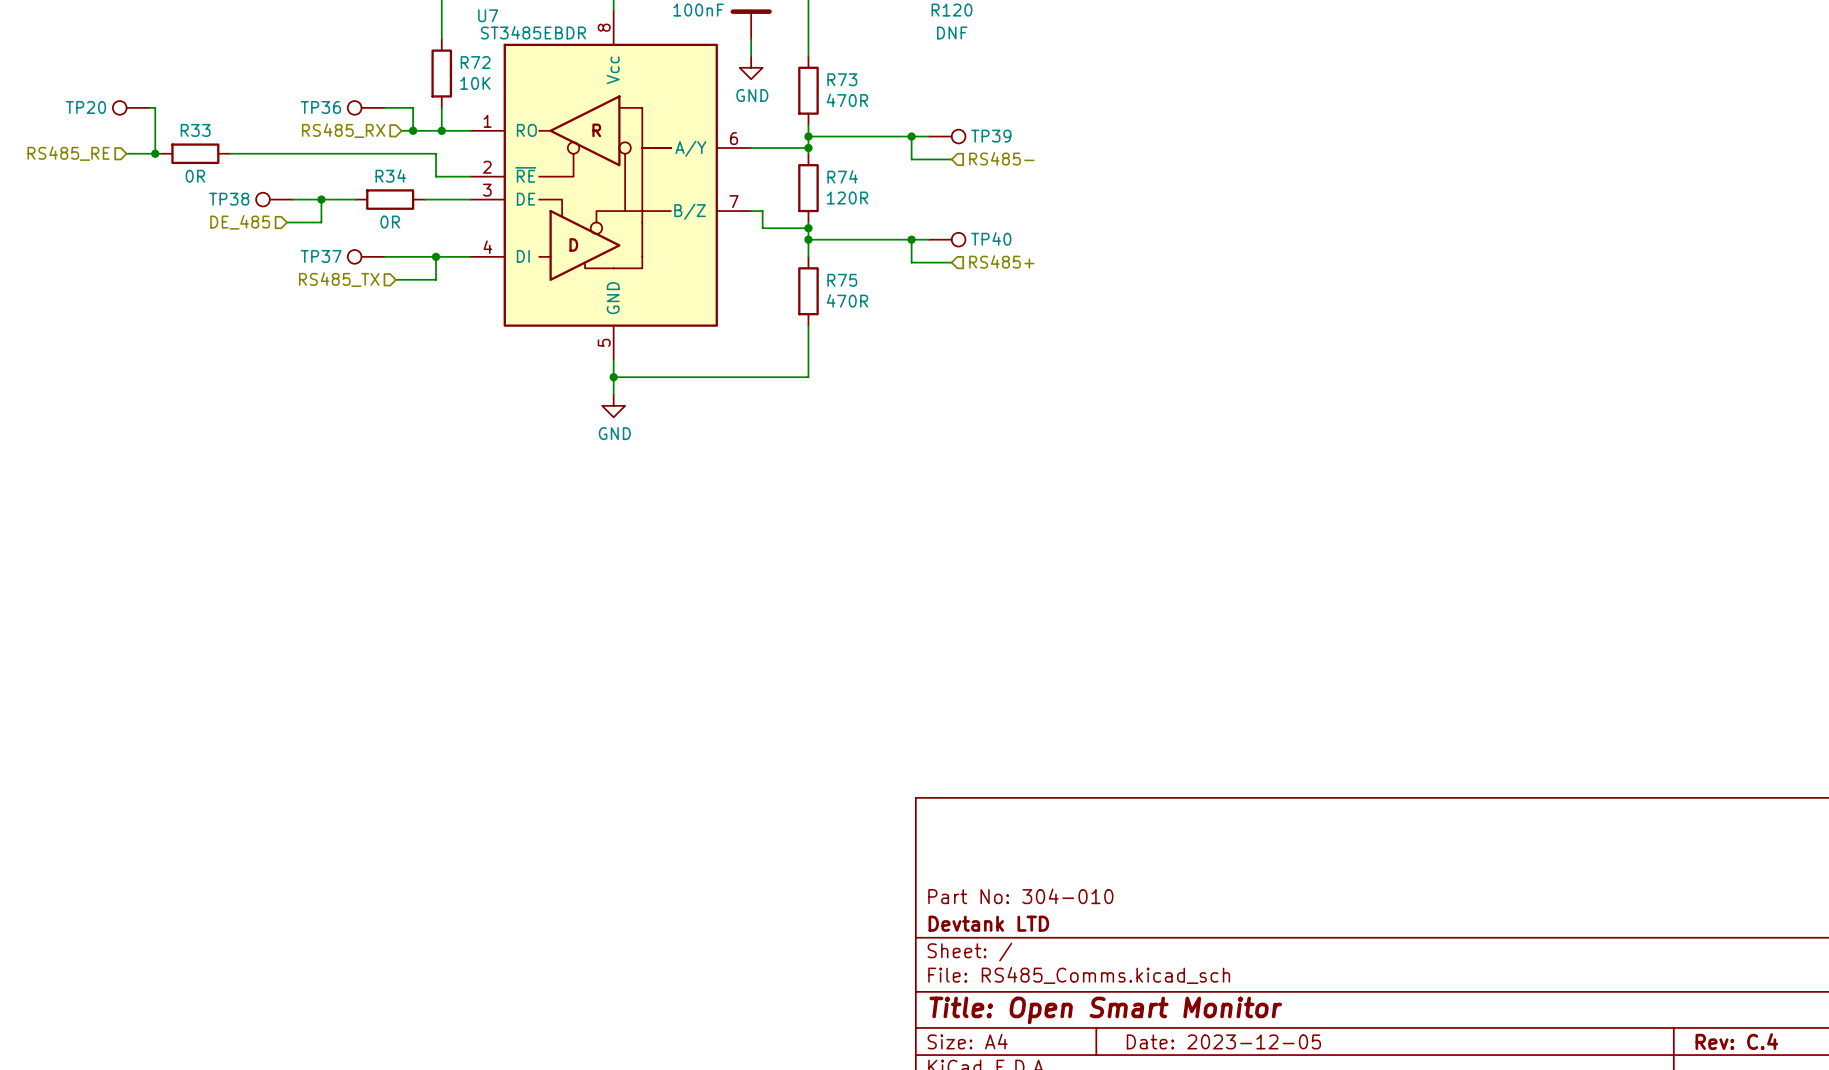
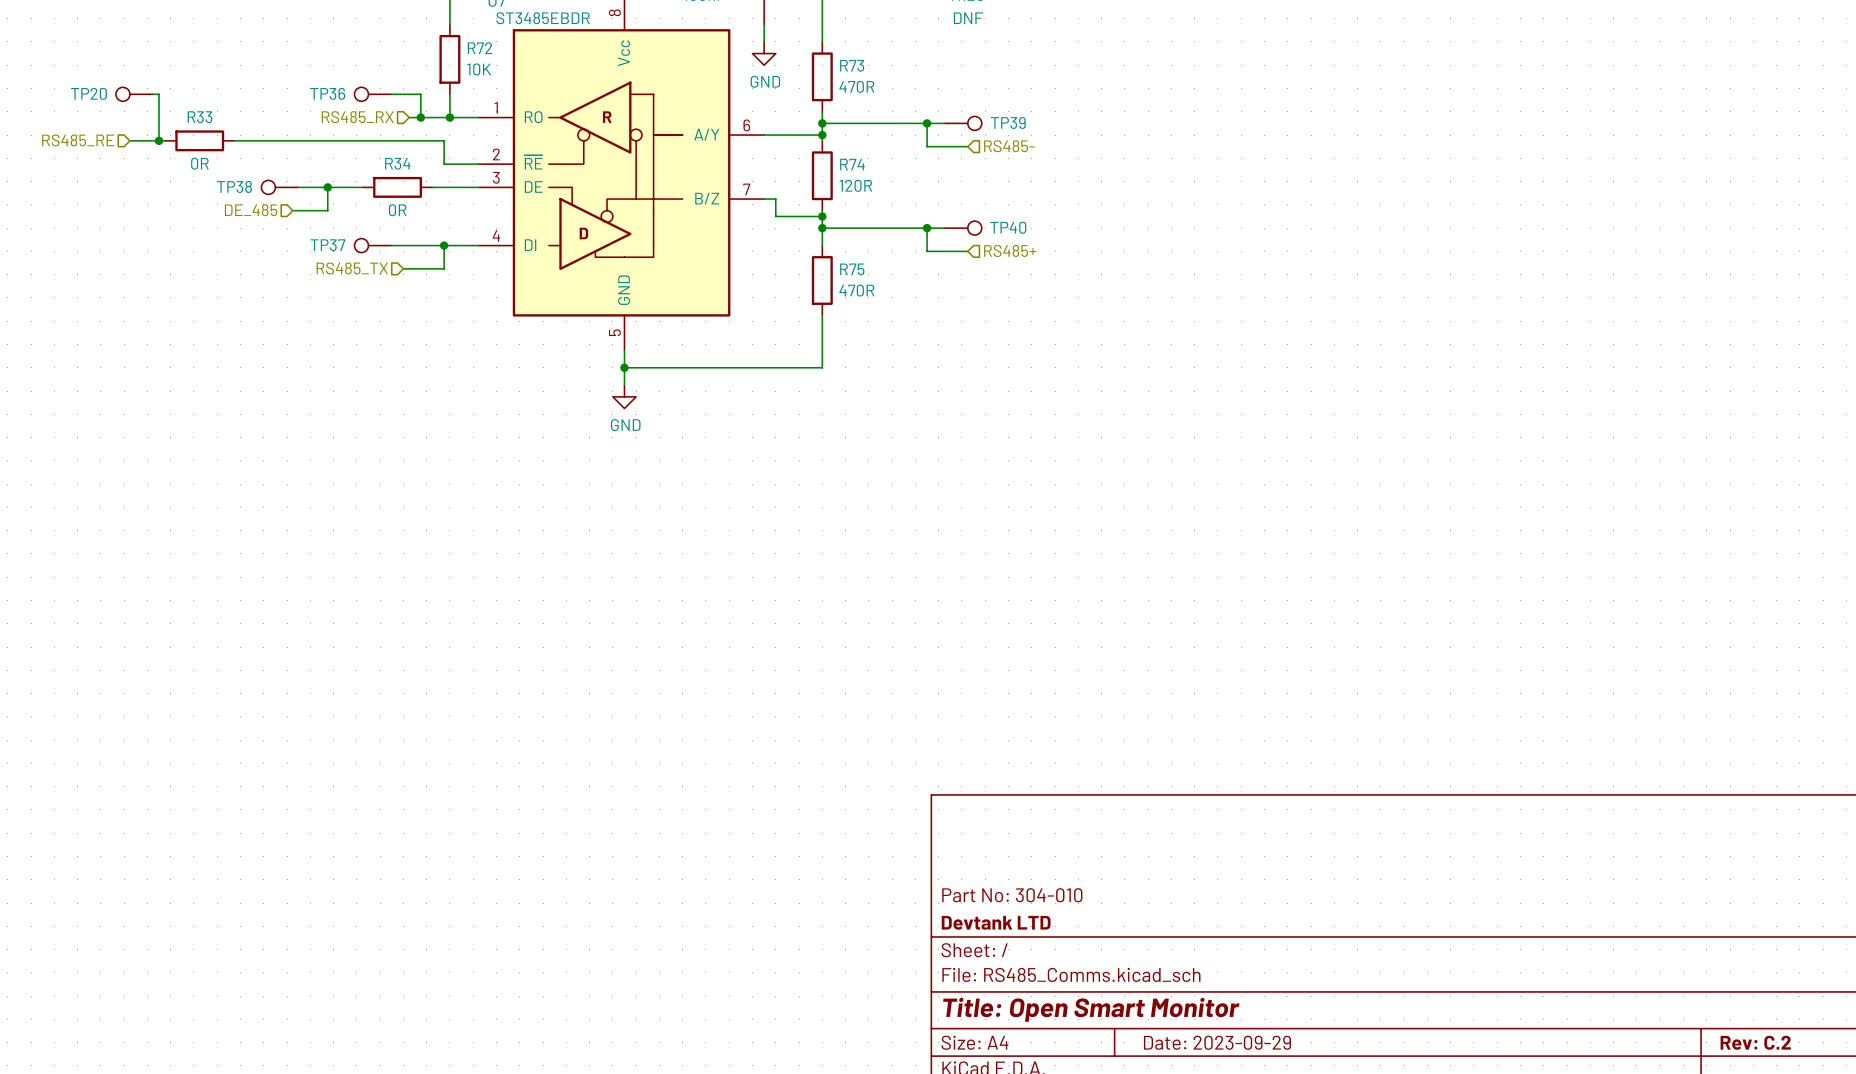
title block: Date: 2023-12-05 (1223, 1041) -> Date: 2023-09-29 (1217, 1042)
title block: Rev: C.4 (1736, 1041) -> Rev: C.2 (1755, 1042)

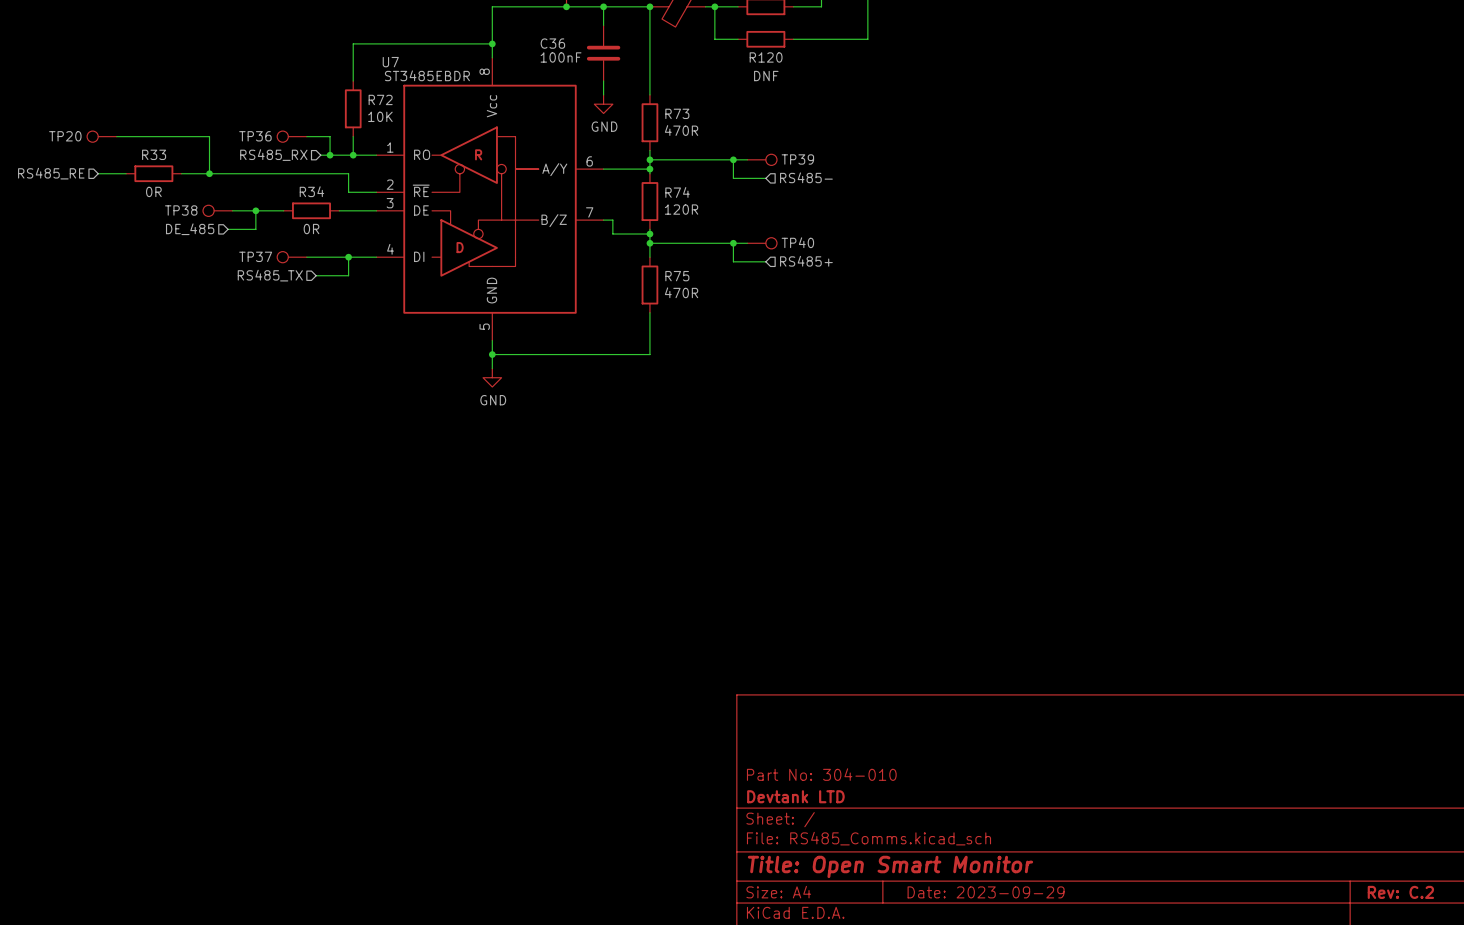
wire: (159, 94) (159, 140) -> (121, 136) (209, 136) (209, 173)
junction: (159, 140) -> none
junction: none -> (209, 173)

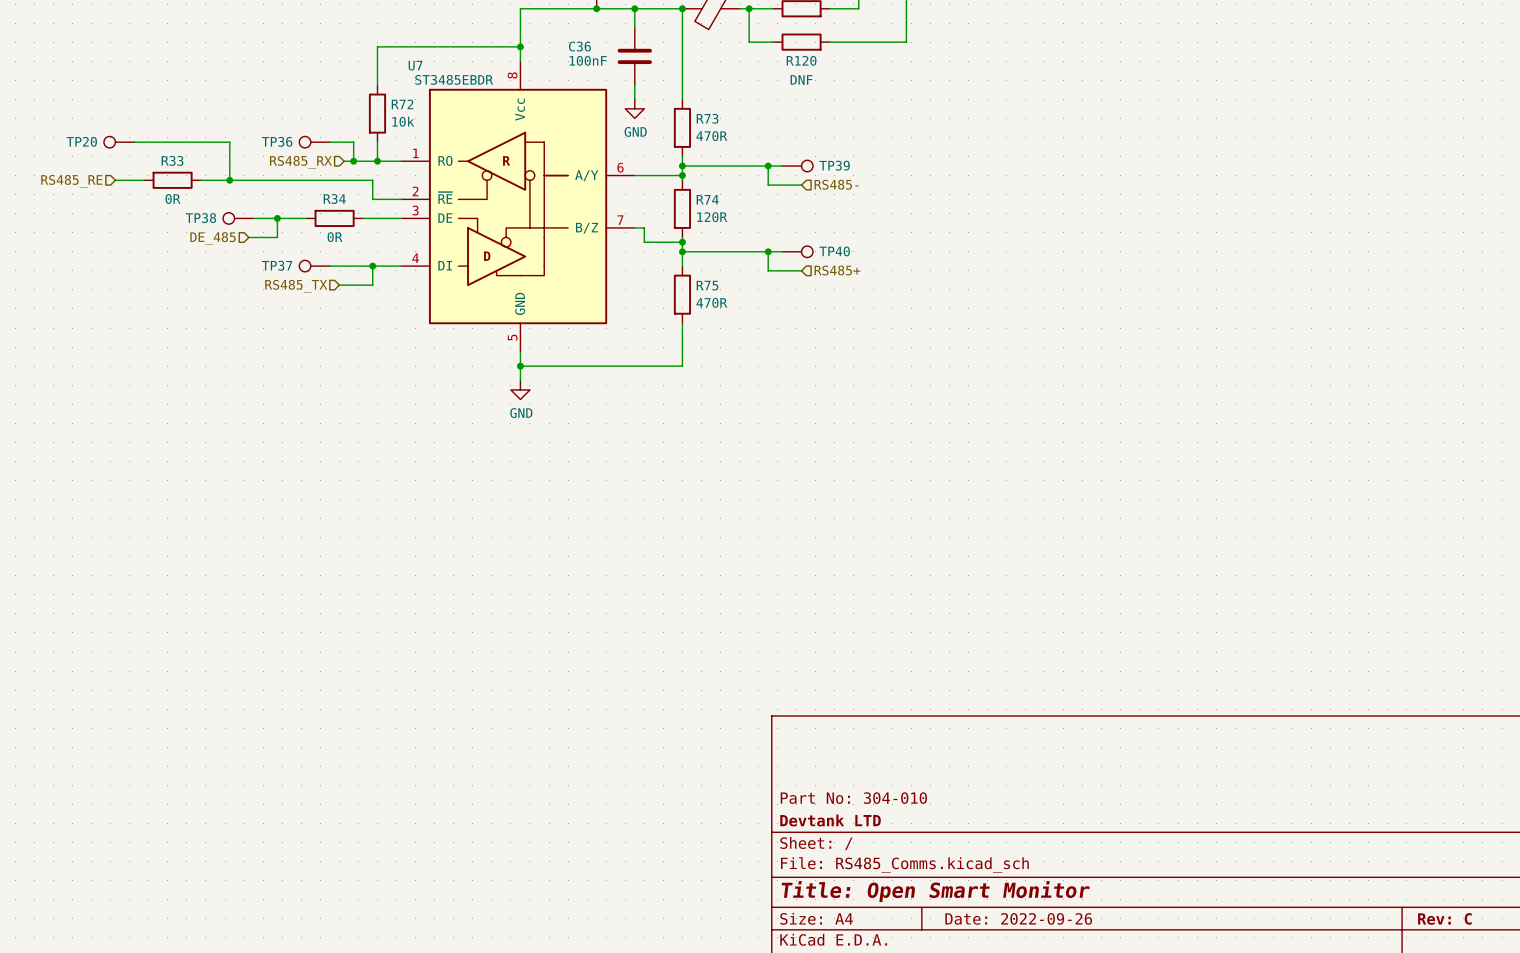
R72 value: 10K (380, 116) -> 10k (403, 121)
title block: Date: 2023-09-29 (986, 892) -> Date: 2022-09-26 (1018, 918)
title block: Rev: C.2 (1400, 892) -> Rev: C (1444, 918)

